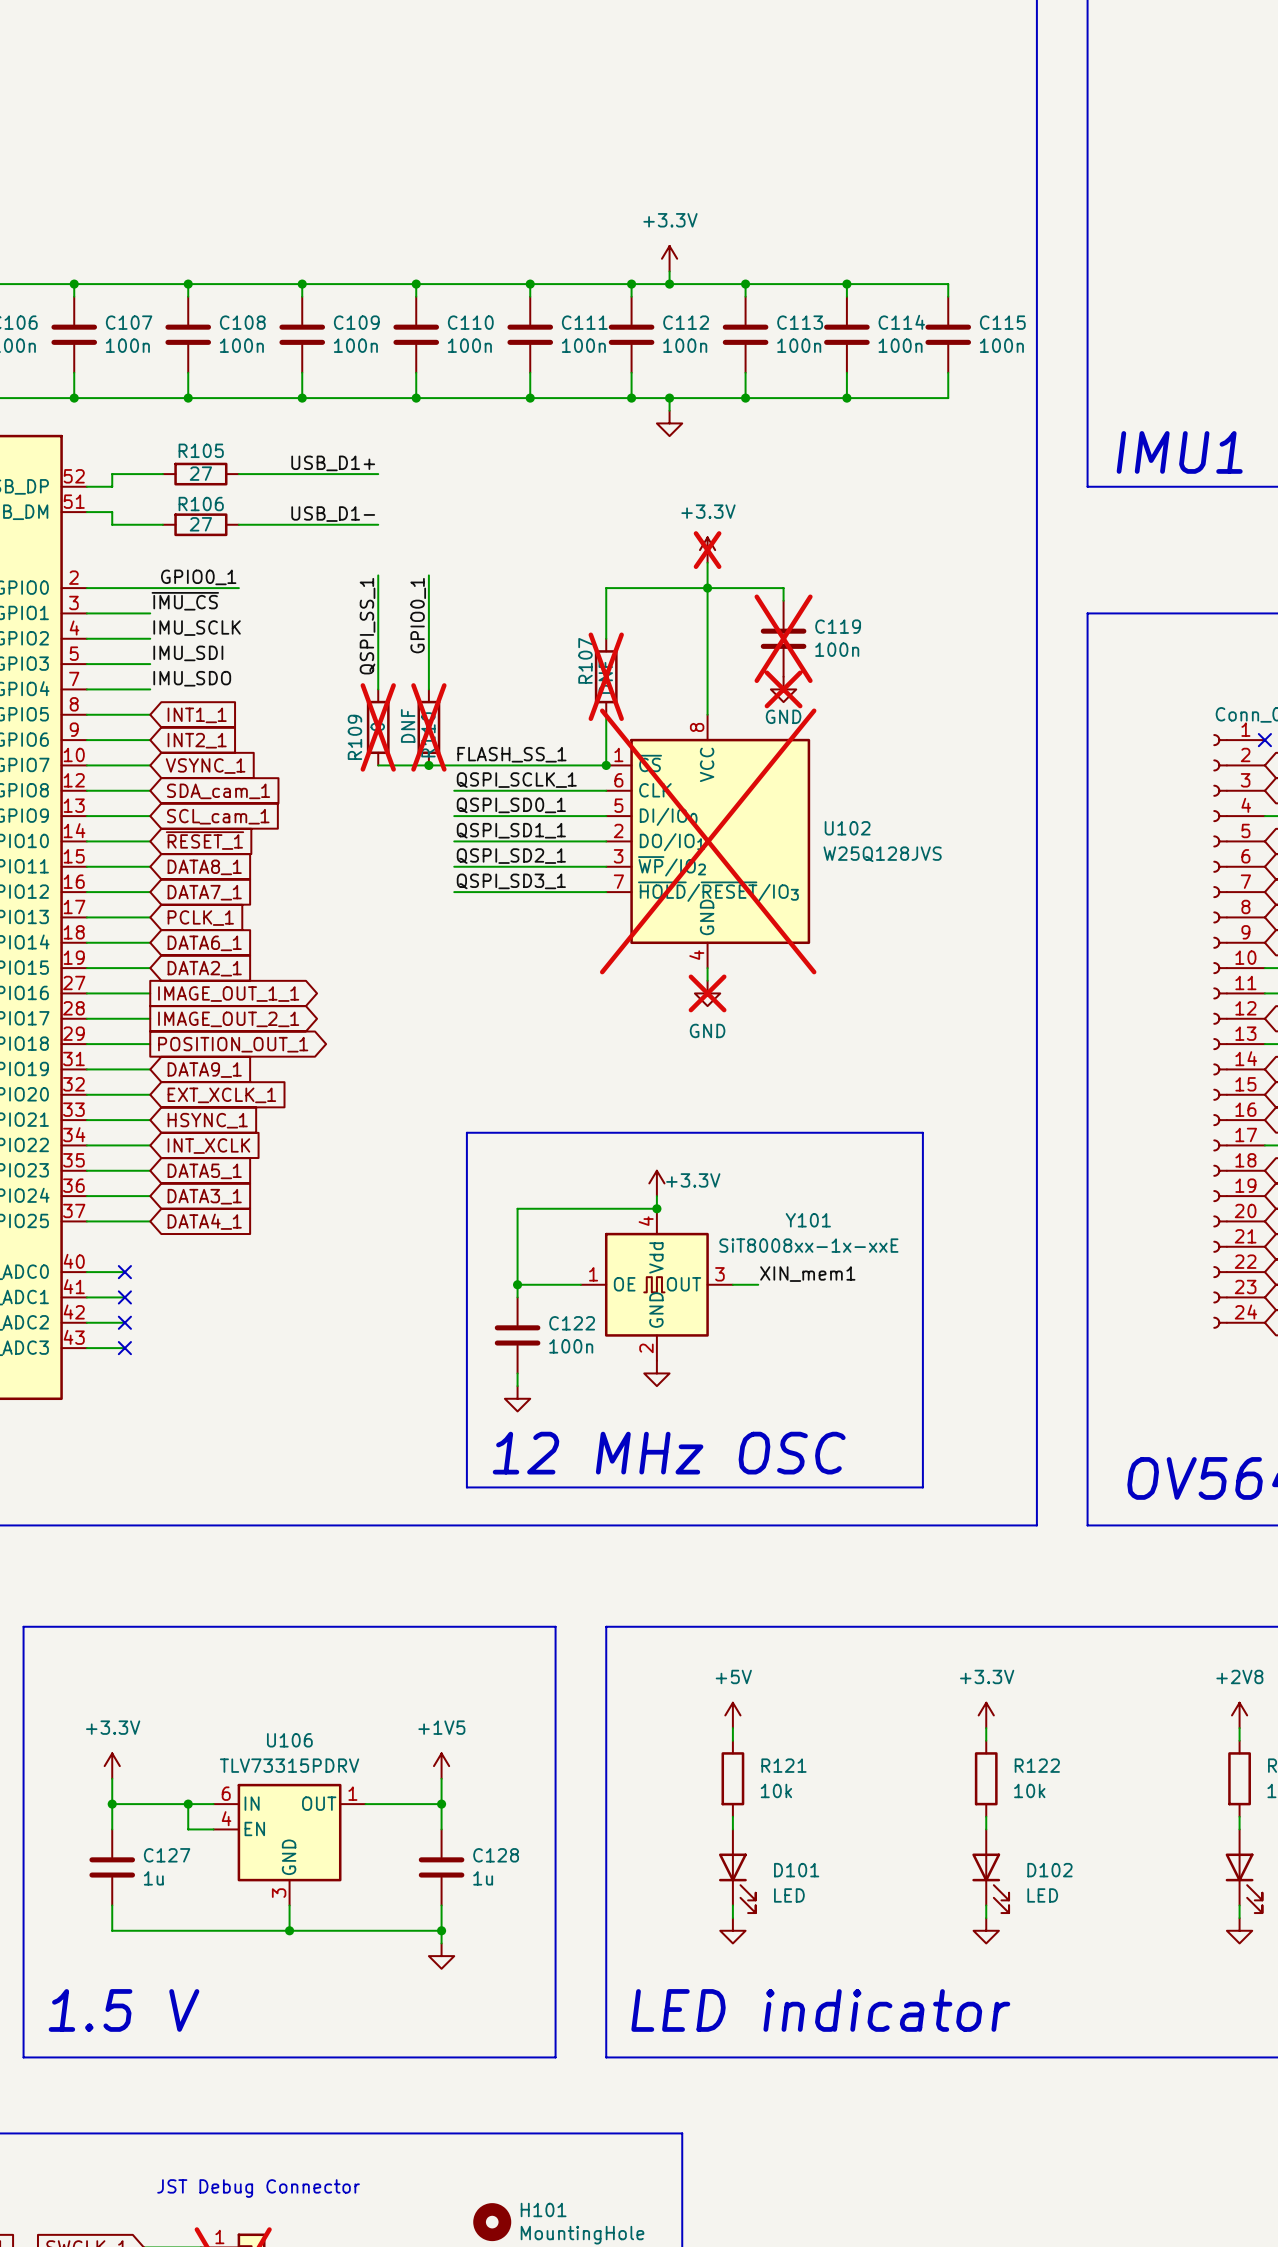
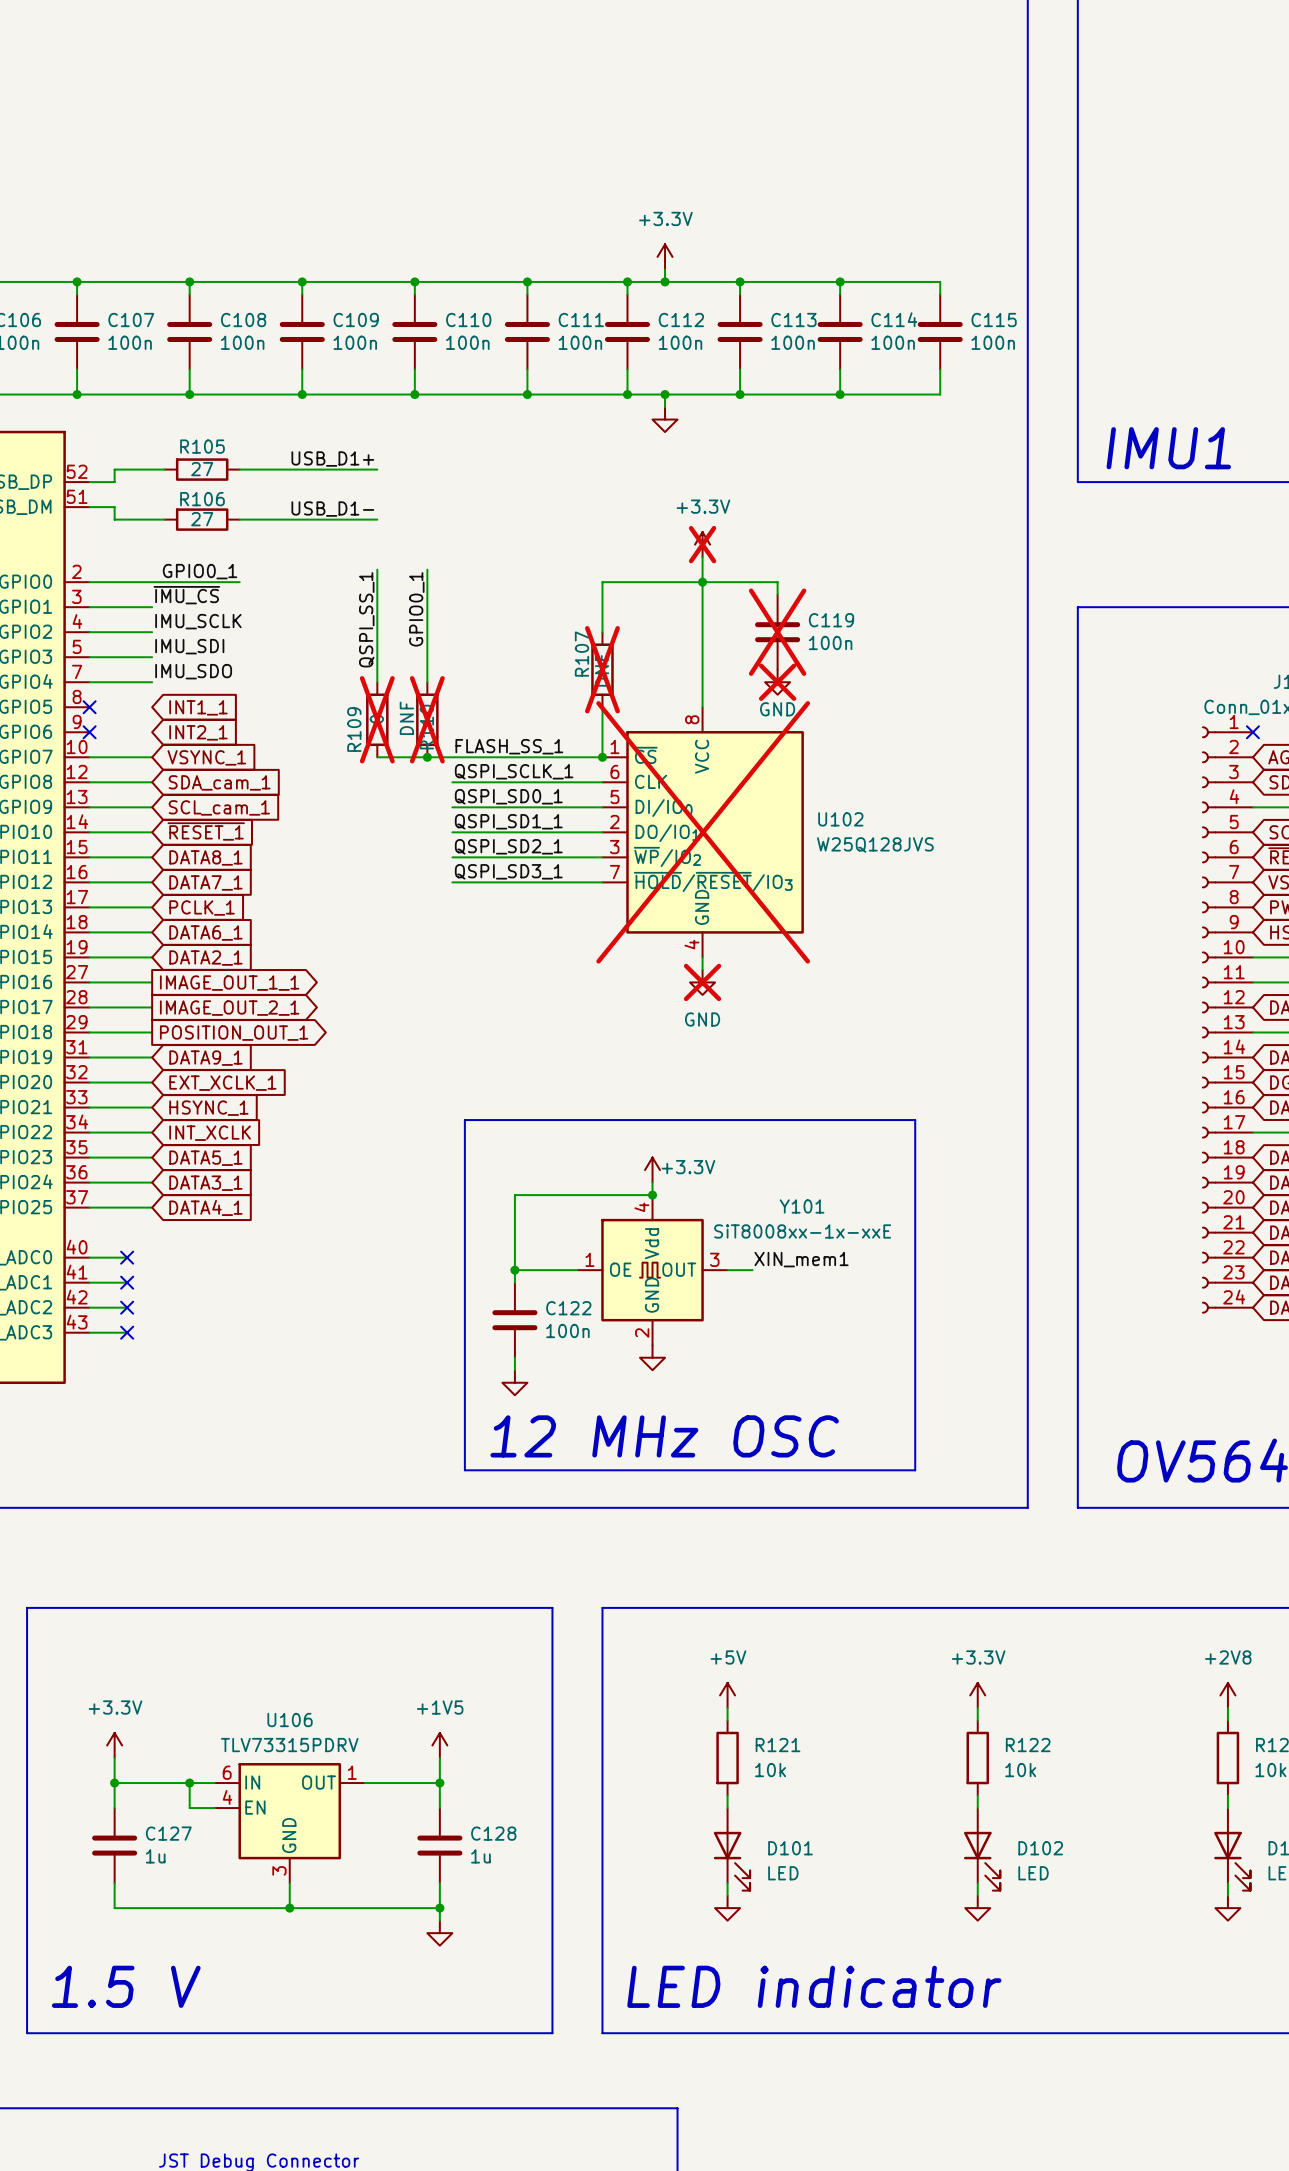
wire: (86, 714) (150, 714) -> none
no-connect mark: none -> (89, 707)
wire: (86, 740) (150, 740) -> none
no-connect mark: none -> (89, 732)

